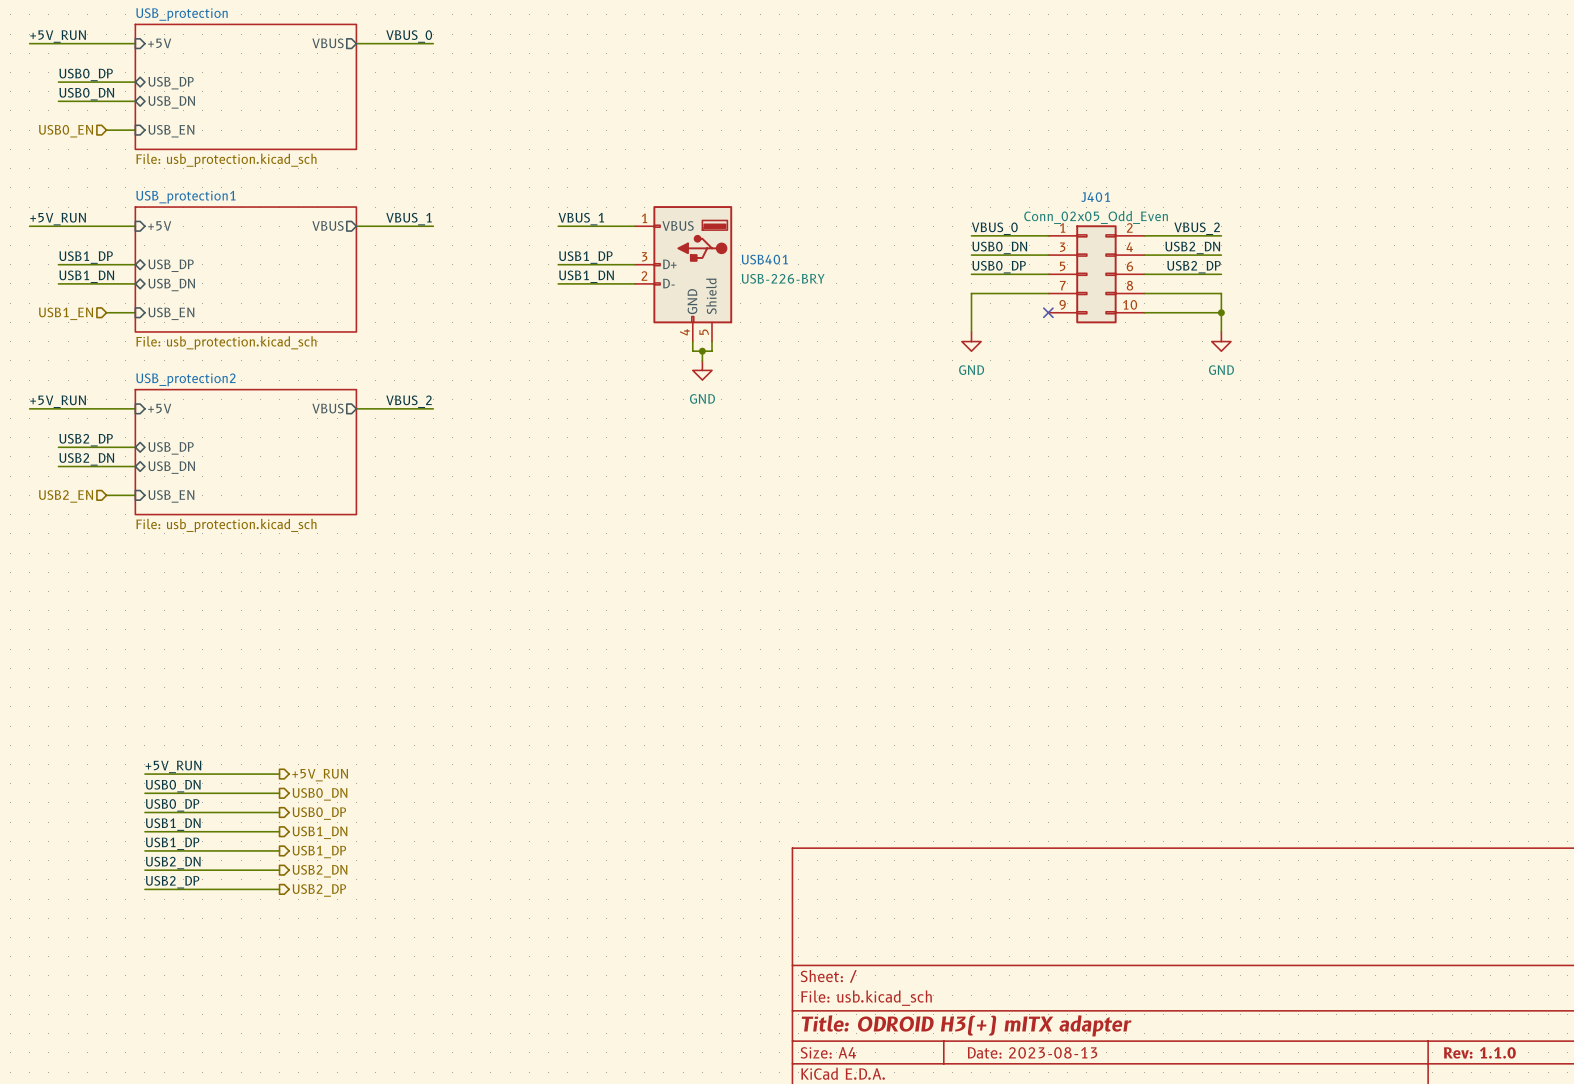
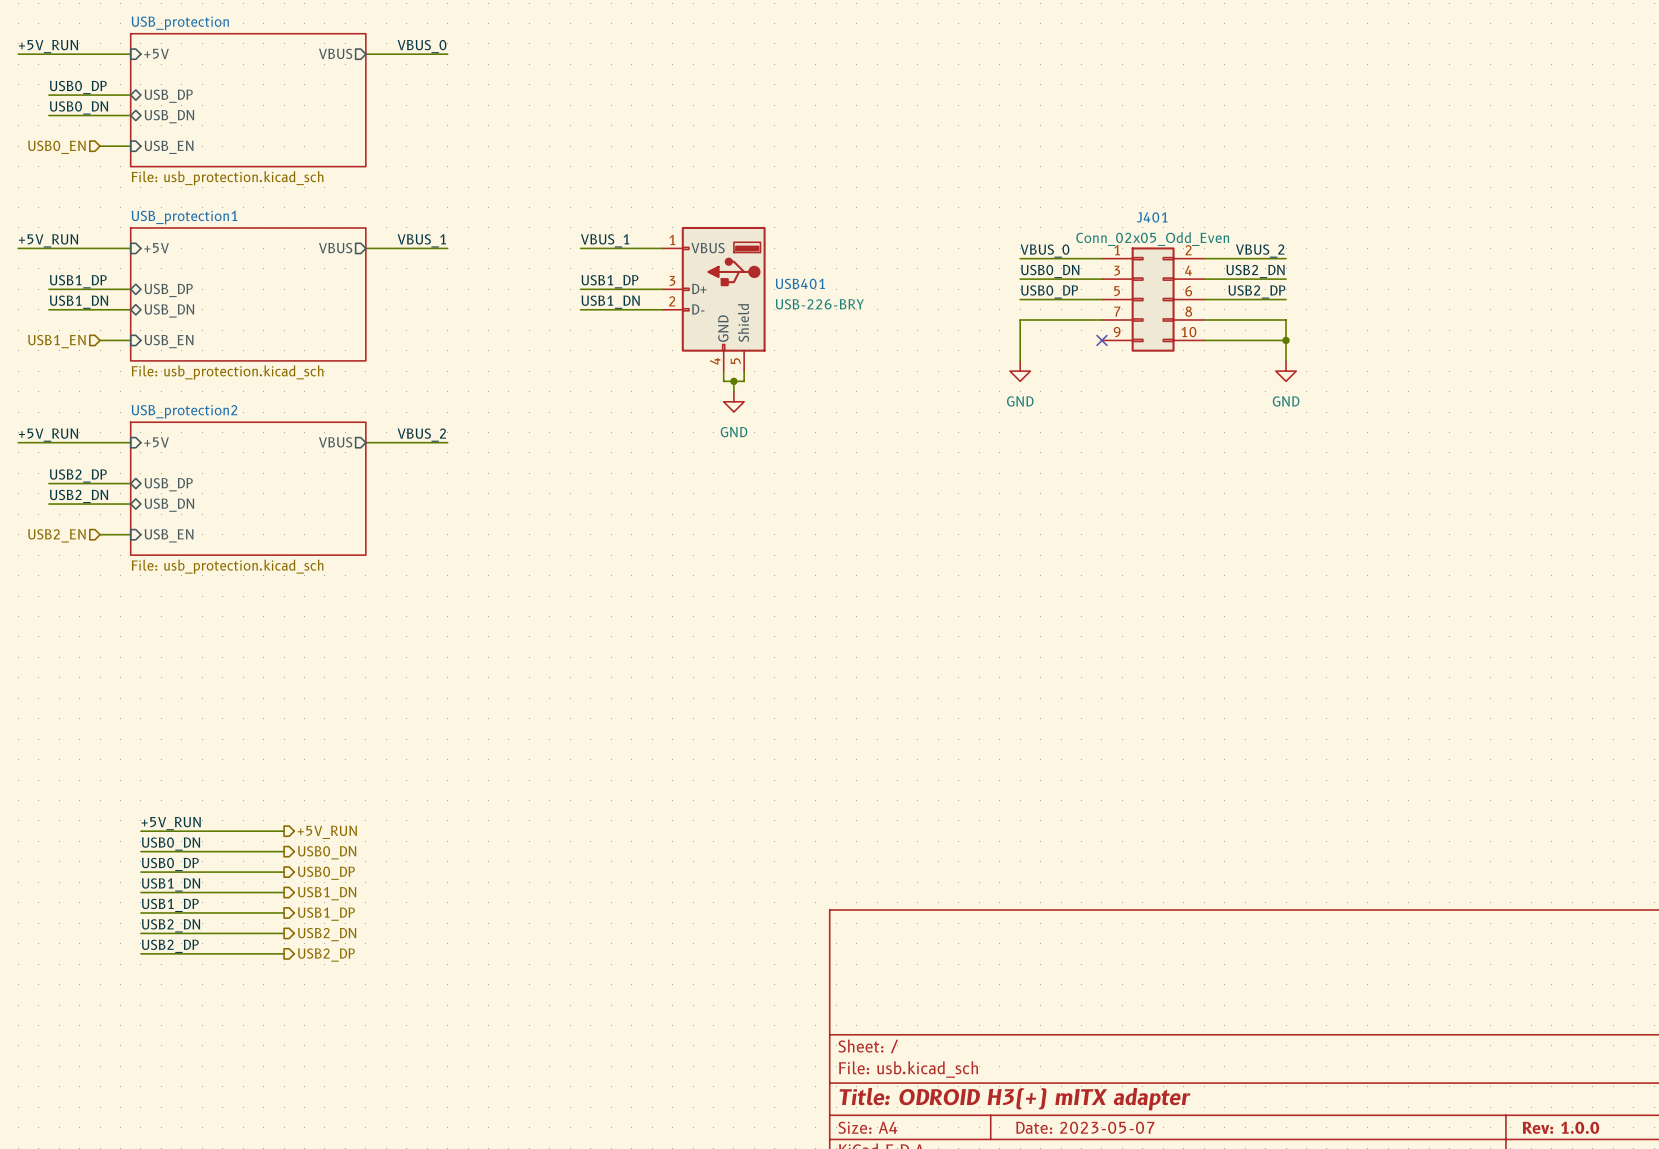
title block: Date: 2023-08-13 (1032, 1052) -> Date: 2023-05-07 (1085, 1127)
title block: Rev: 1.1.0 (1479, 1052) -> Rev: 1.0.0 (1560, 1127)

